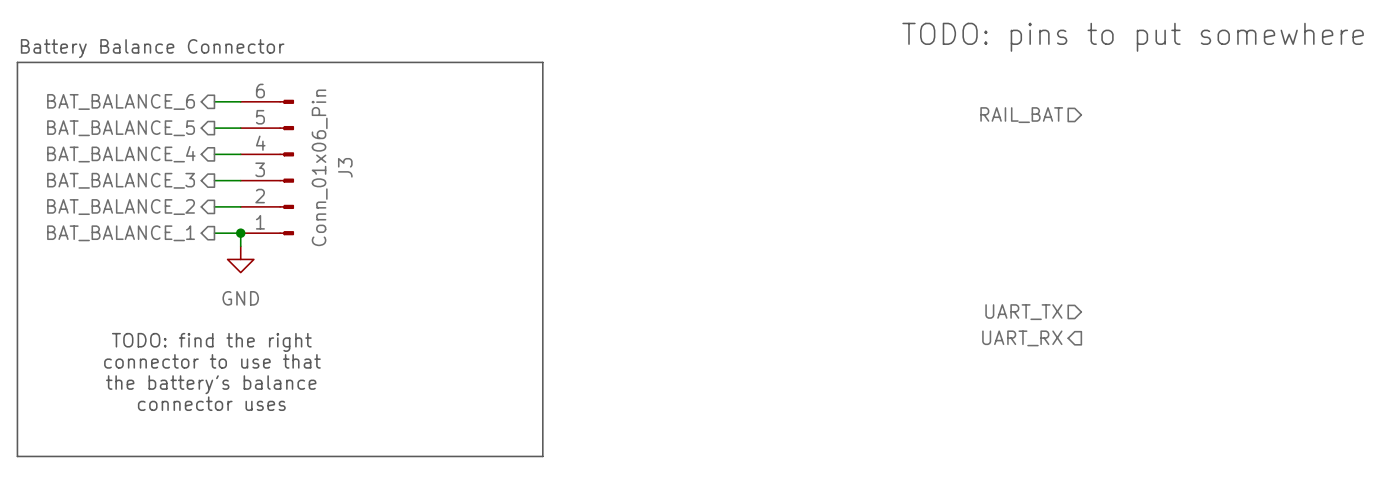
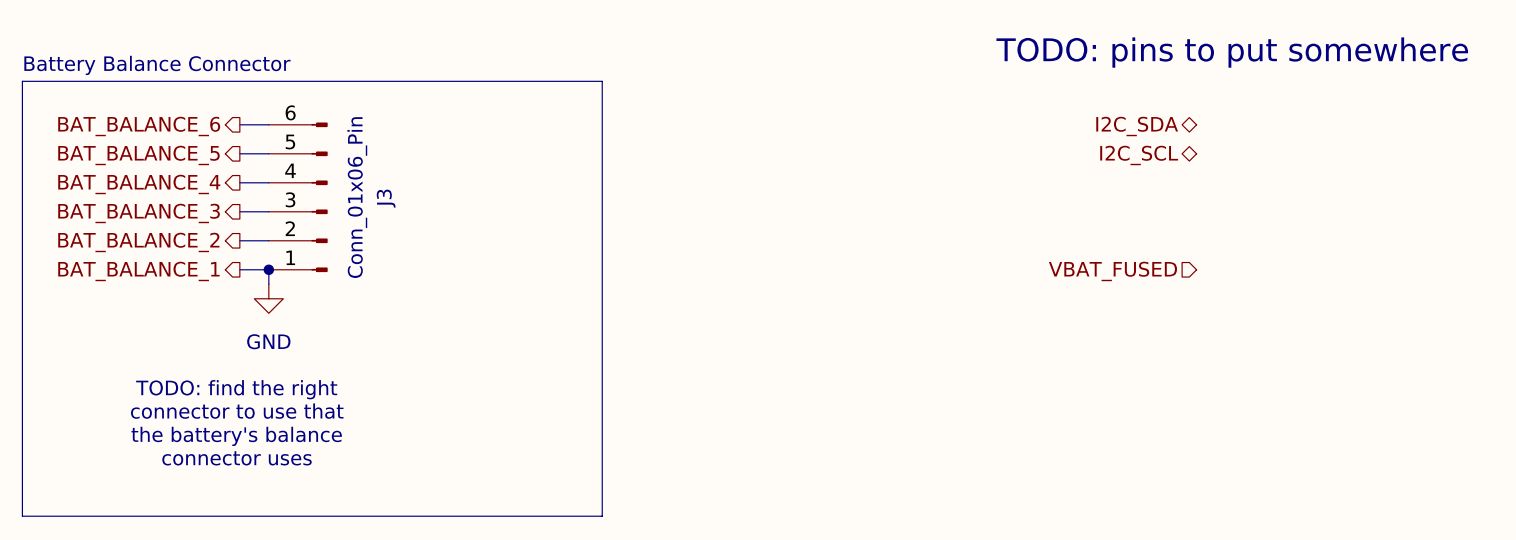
hierarchical label: none -> I2C_SDA (1137, 126)
hierarchical label: RAIL_BAT (1021, 115) -> none
hierarchical label: none -> I2C_SCL (1139, 155)
hierarchical label: none -> VBAT_FUSED (1112, 271)
hierarchical label: UART_TX (1023, 312) -> none
hierarchical label: UART_RX (1022, 338) -> none

